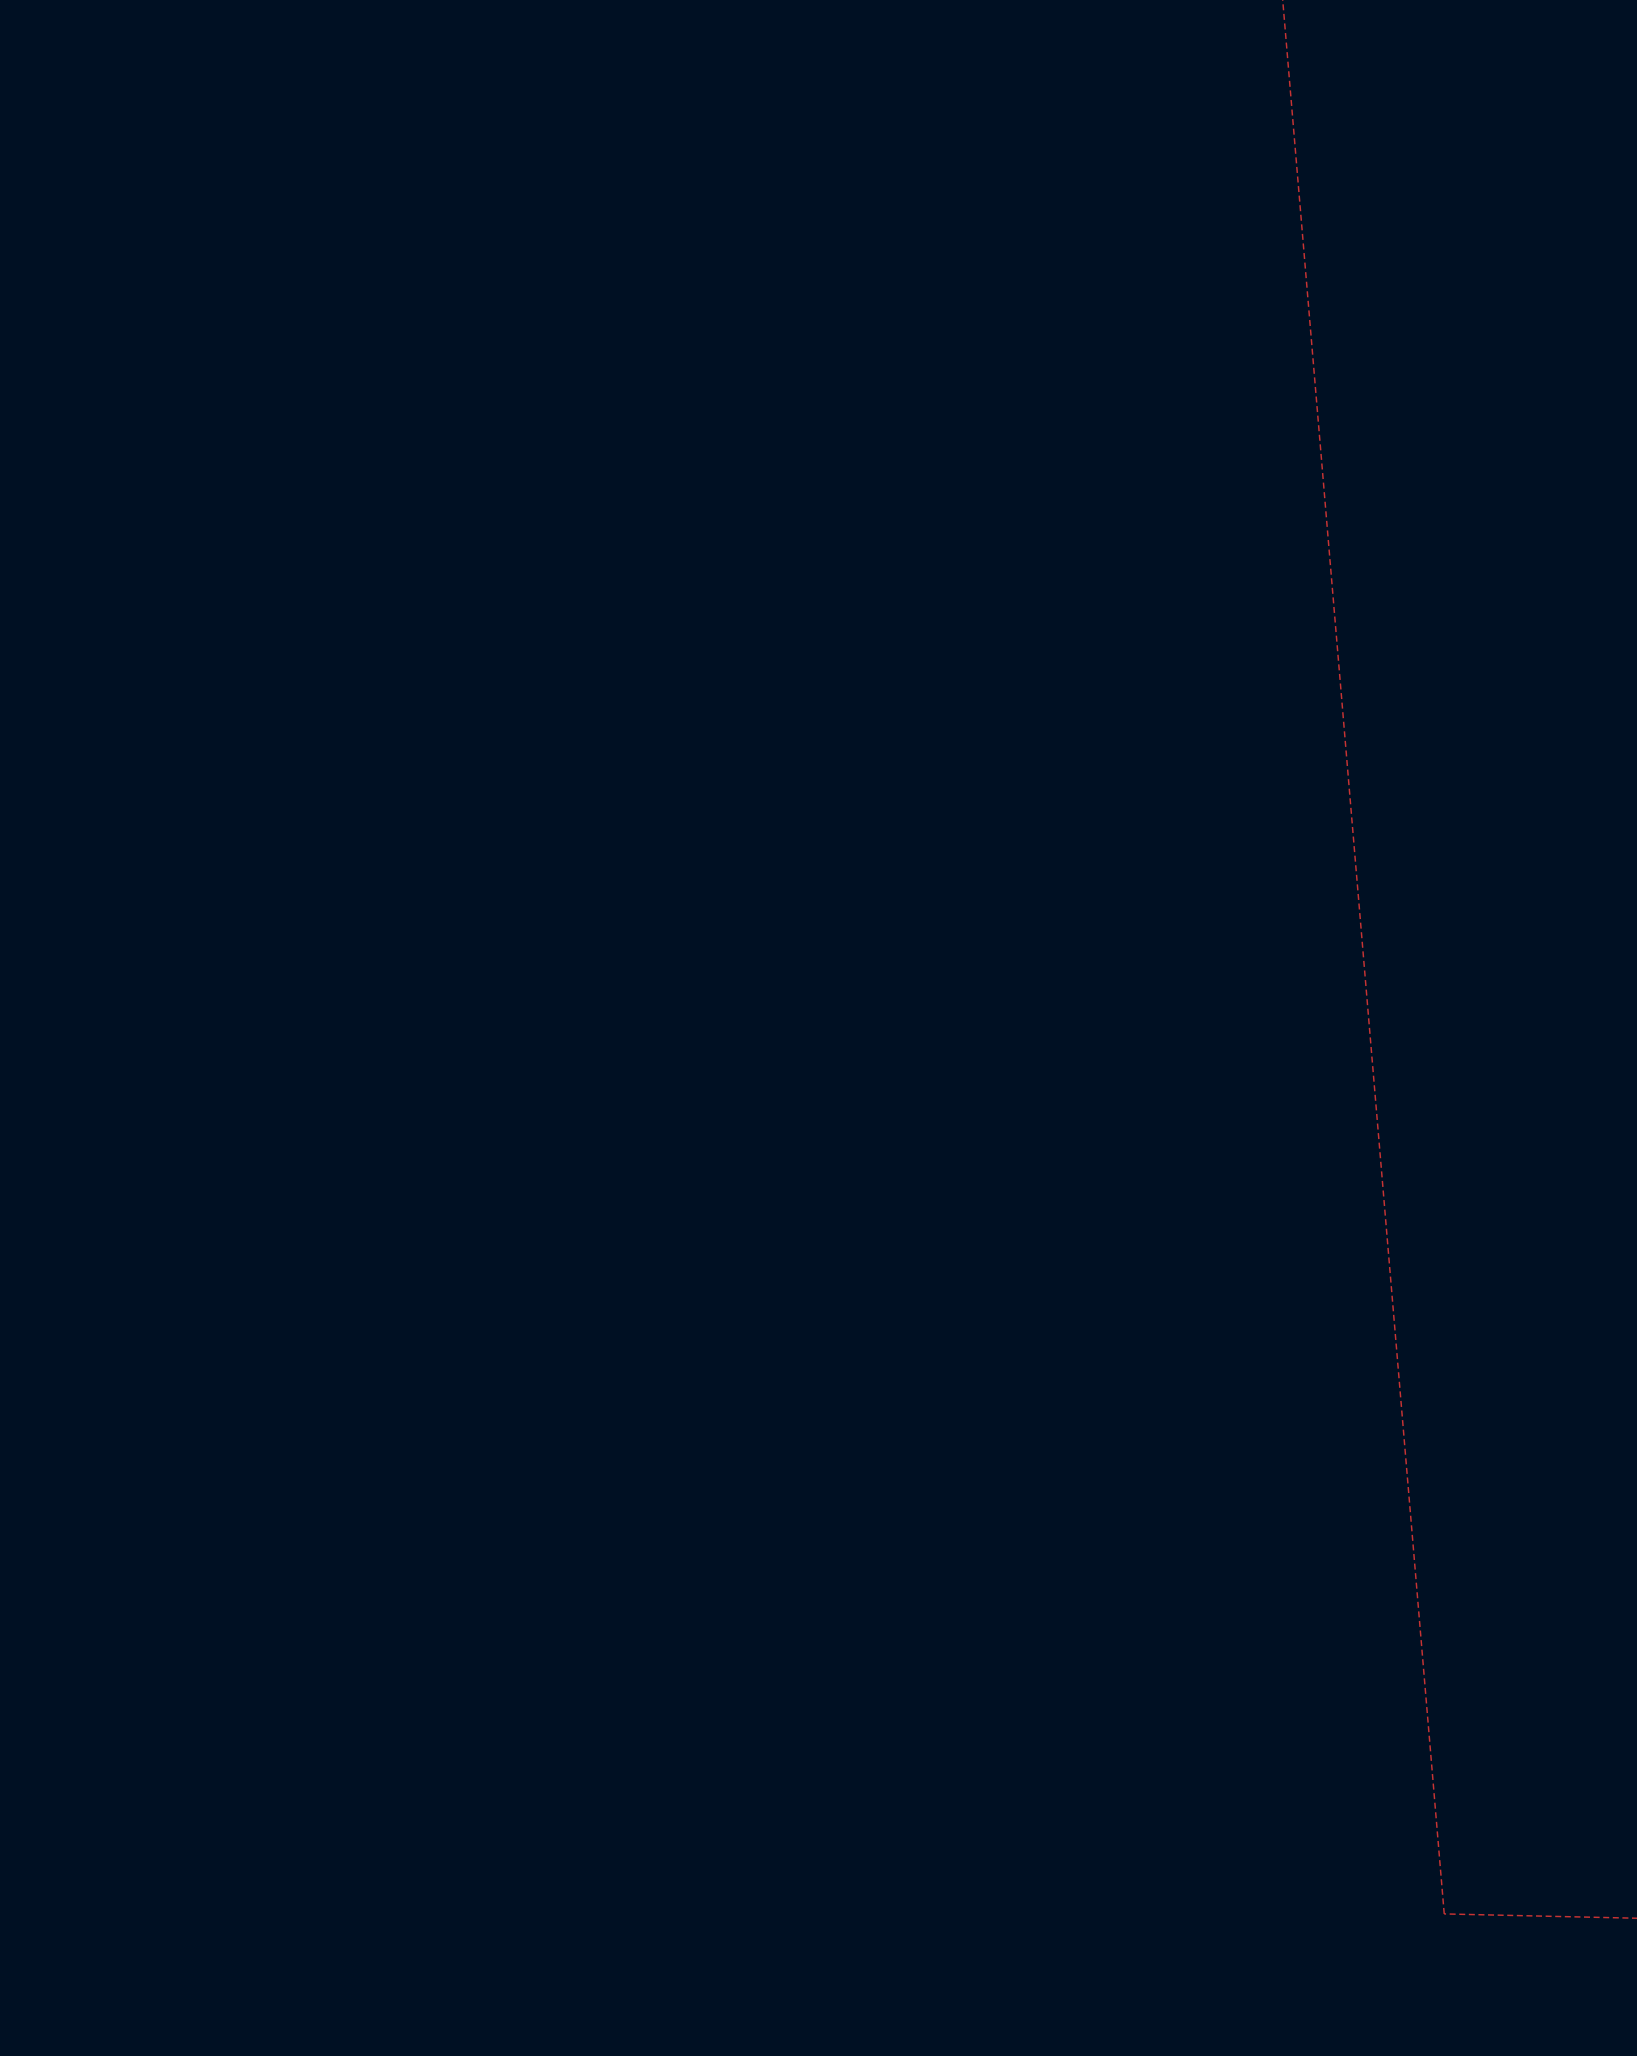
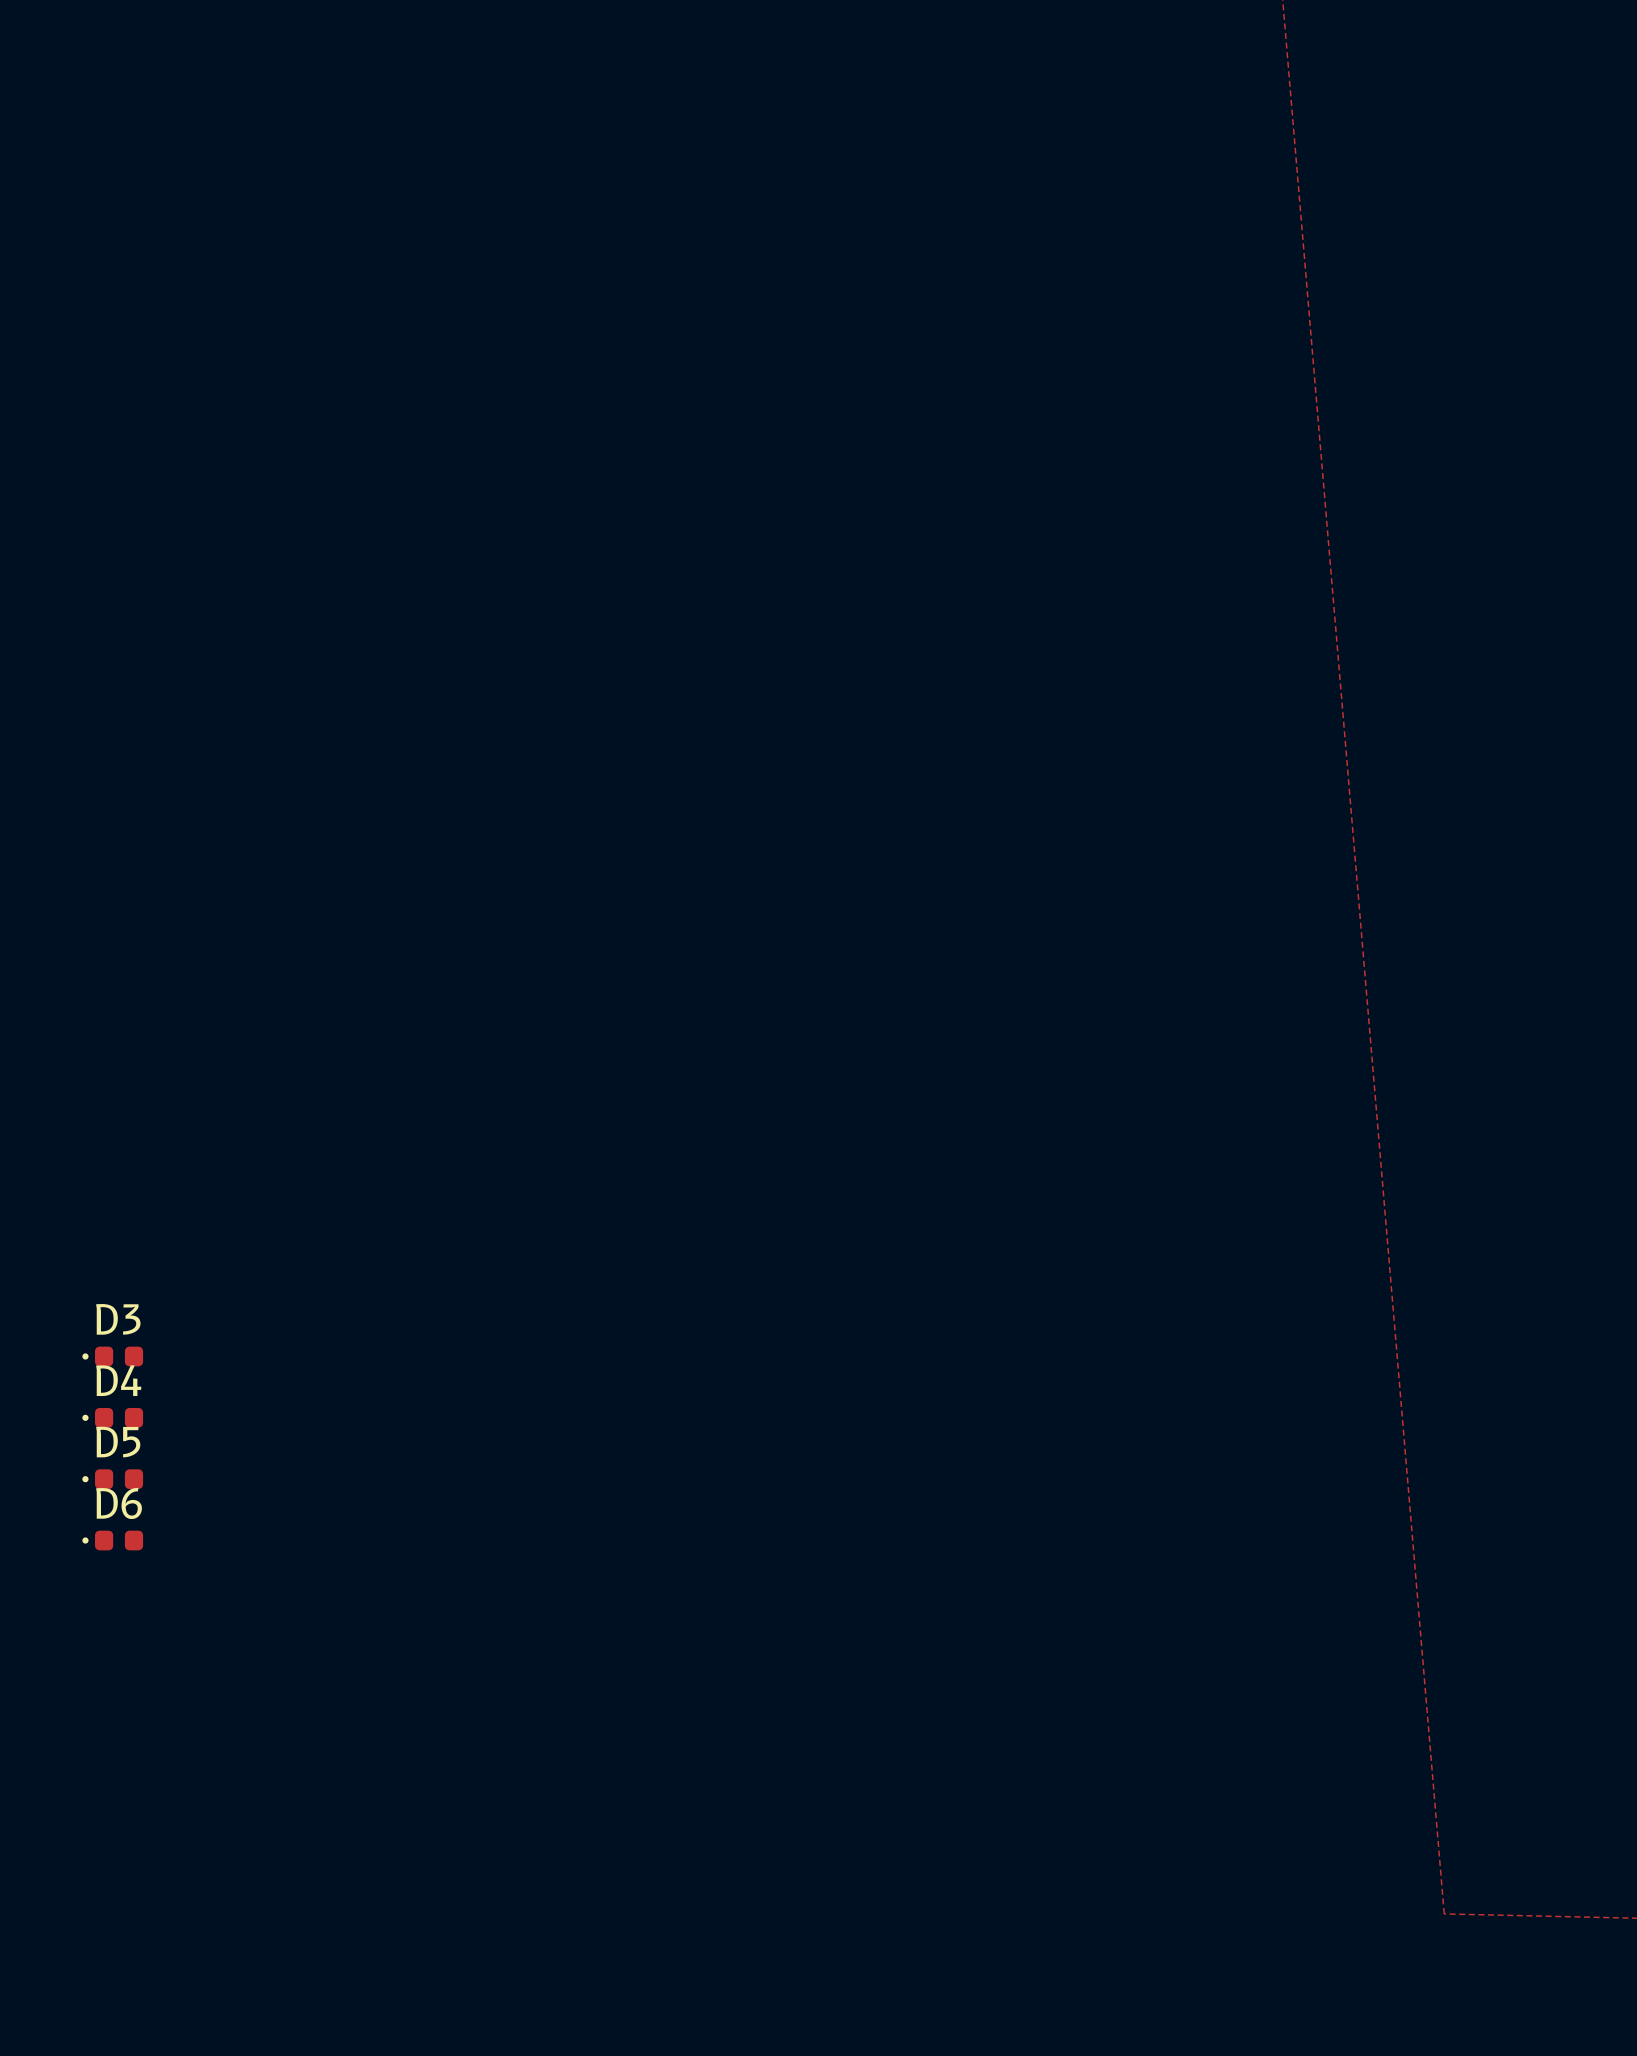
D3: none -> (112, 1356)
D4: none -> (112, 1417)
D5: none -> (112, 1479)
D6: none -> (112, 1540)

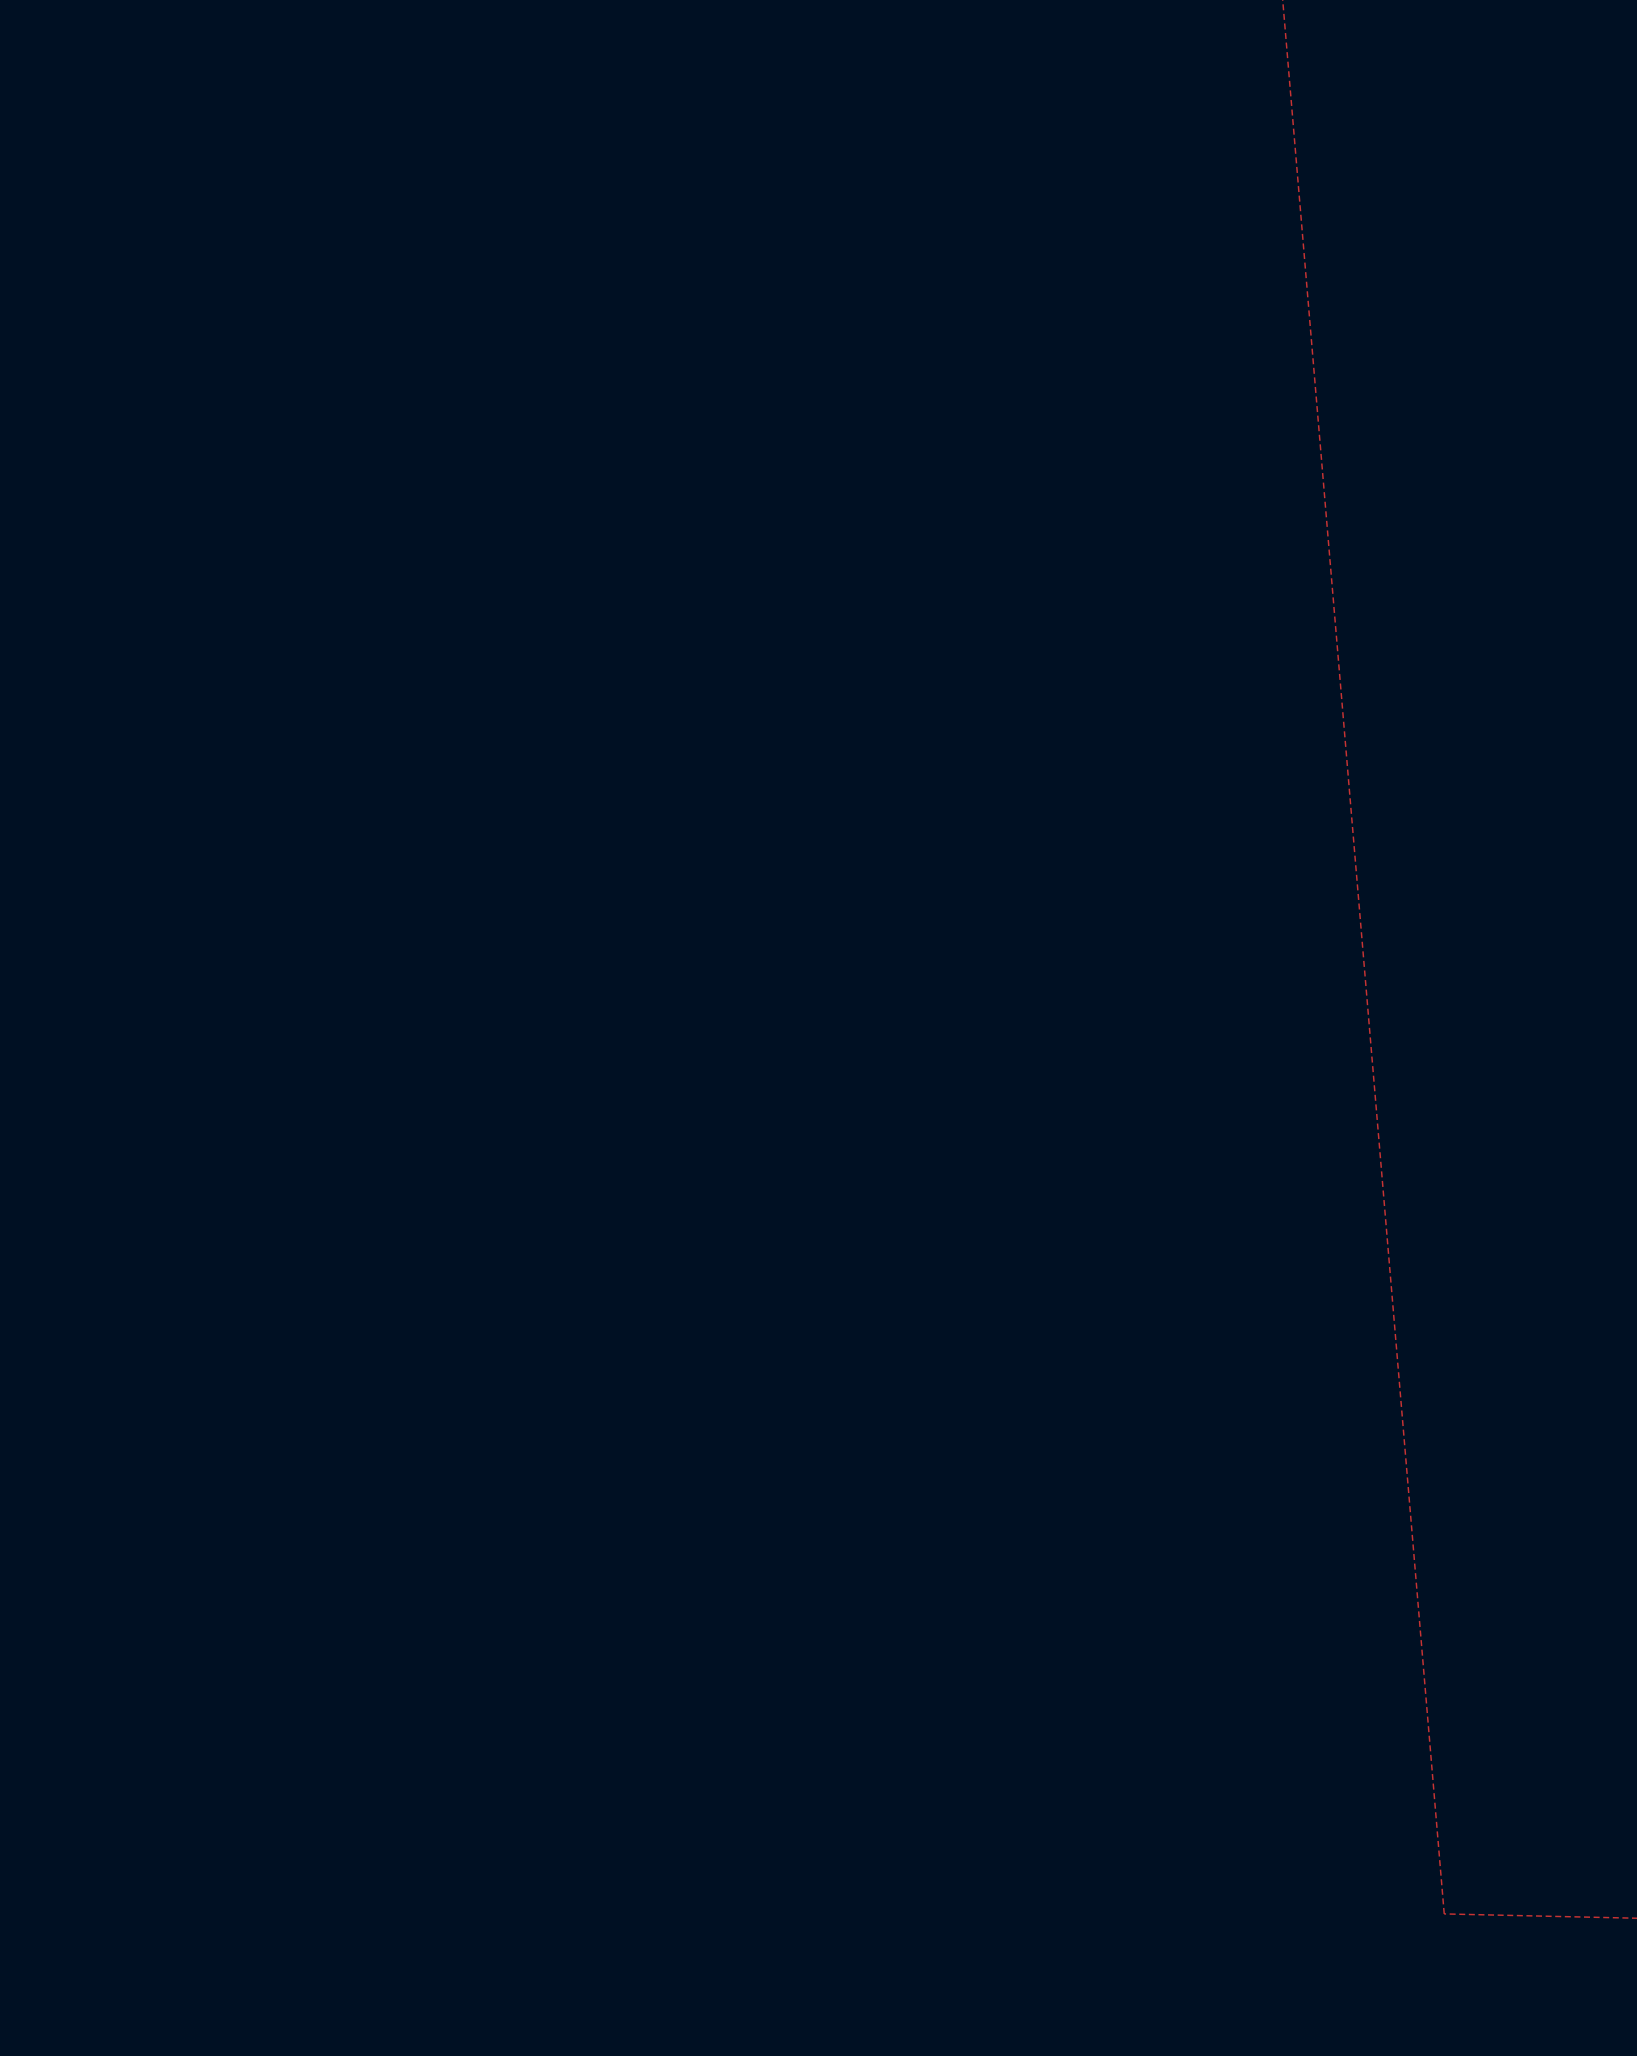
D3: (112, 1356) -> none
D4: (112, 1417) -> none
D5: (112, 1479) -> none
D6: (112, 1540) -> none

